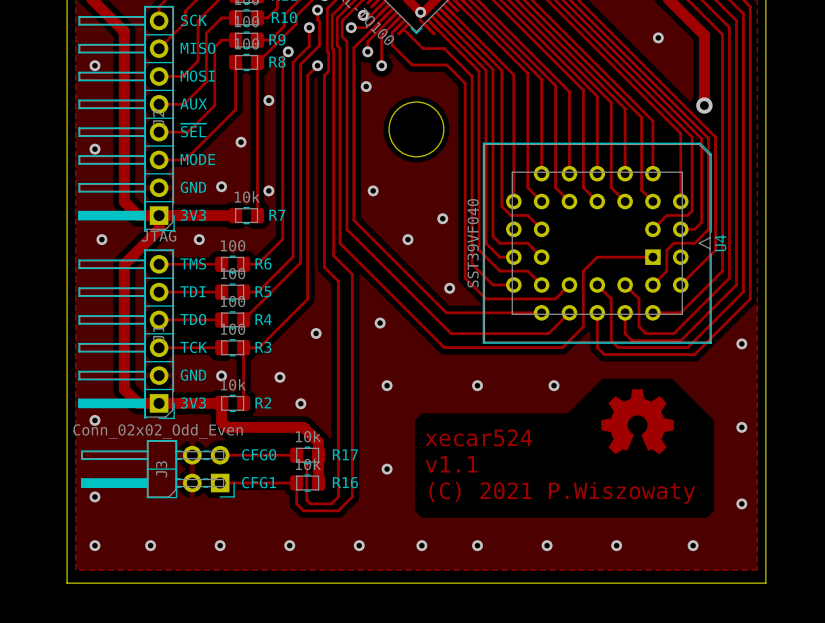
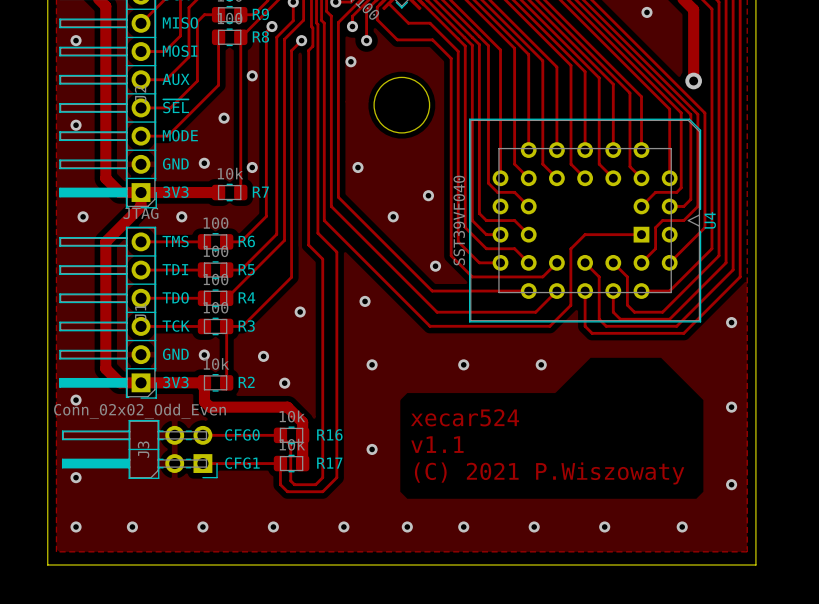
drawing: [601, 389, 674, 455] -> none
R17 name: R17 (345, 454) -> R16 (329, 434)
R16 name: R16 (345, 482) -> R17 (329, 463)

